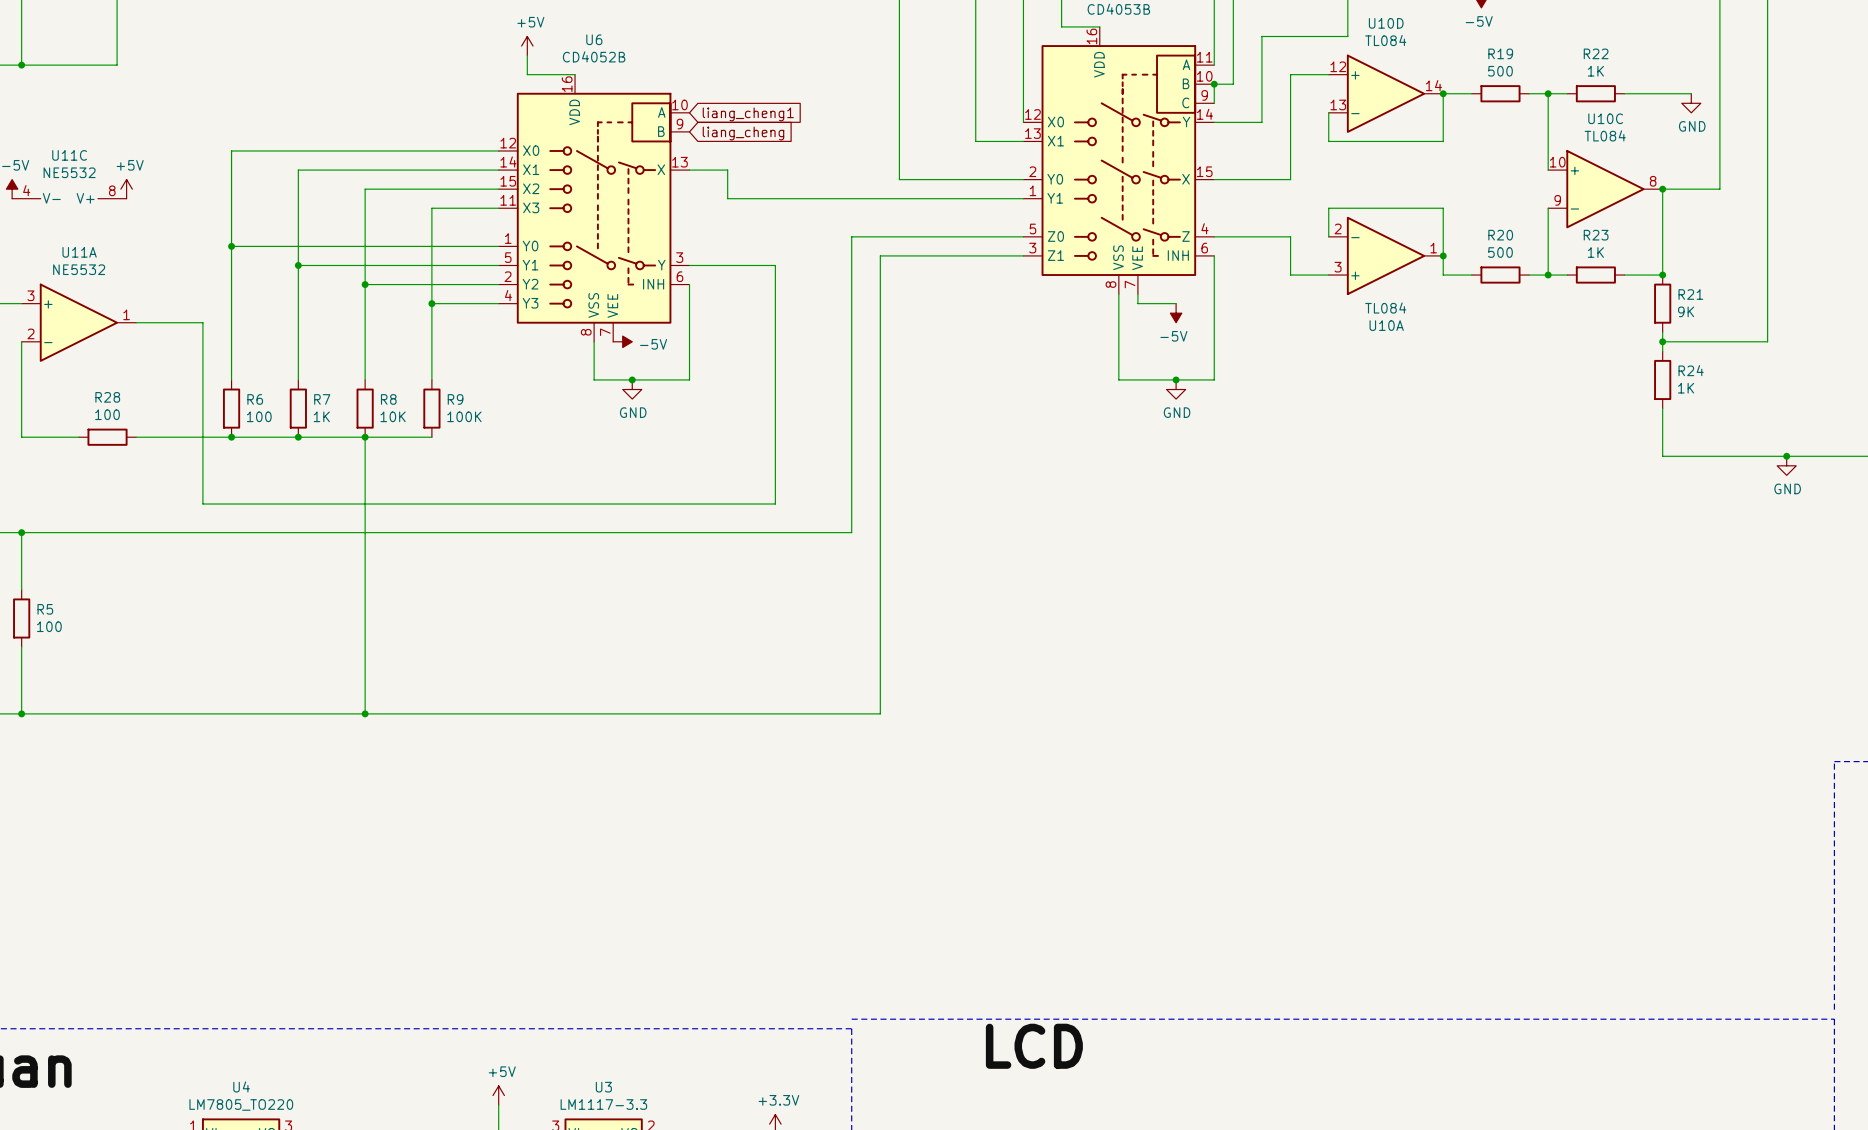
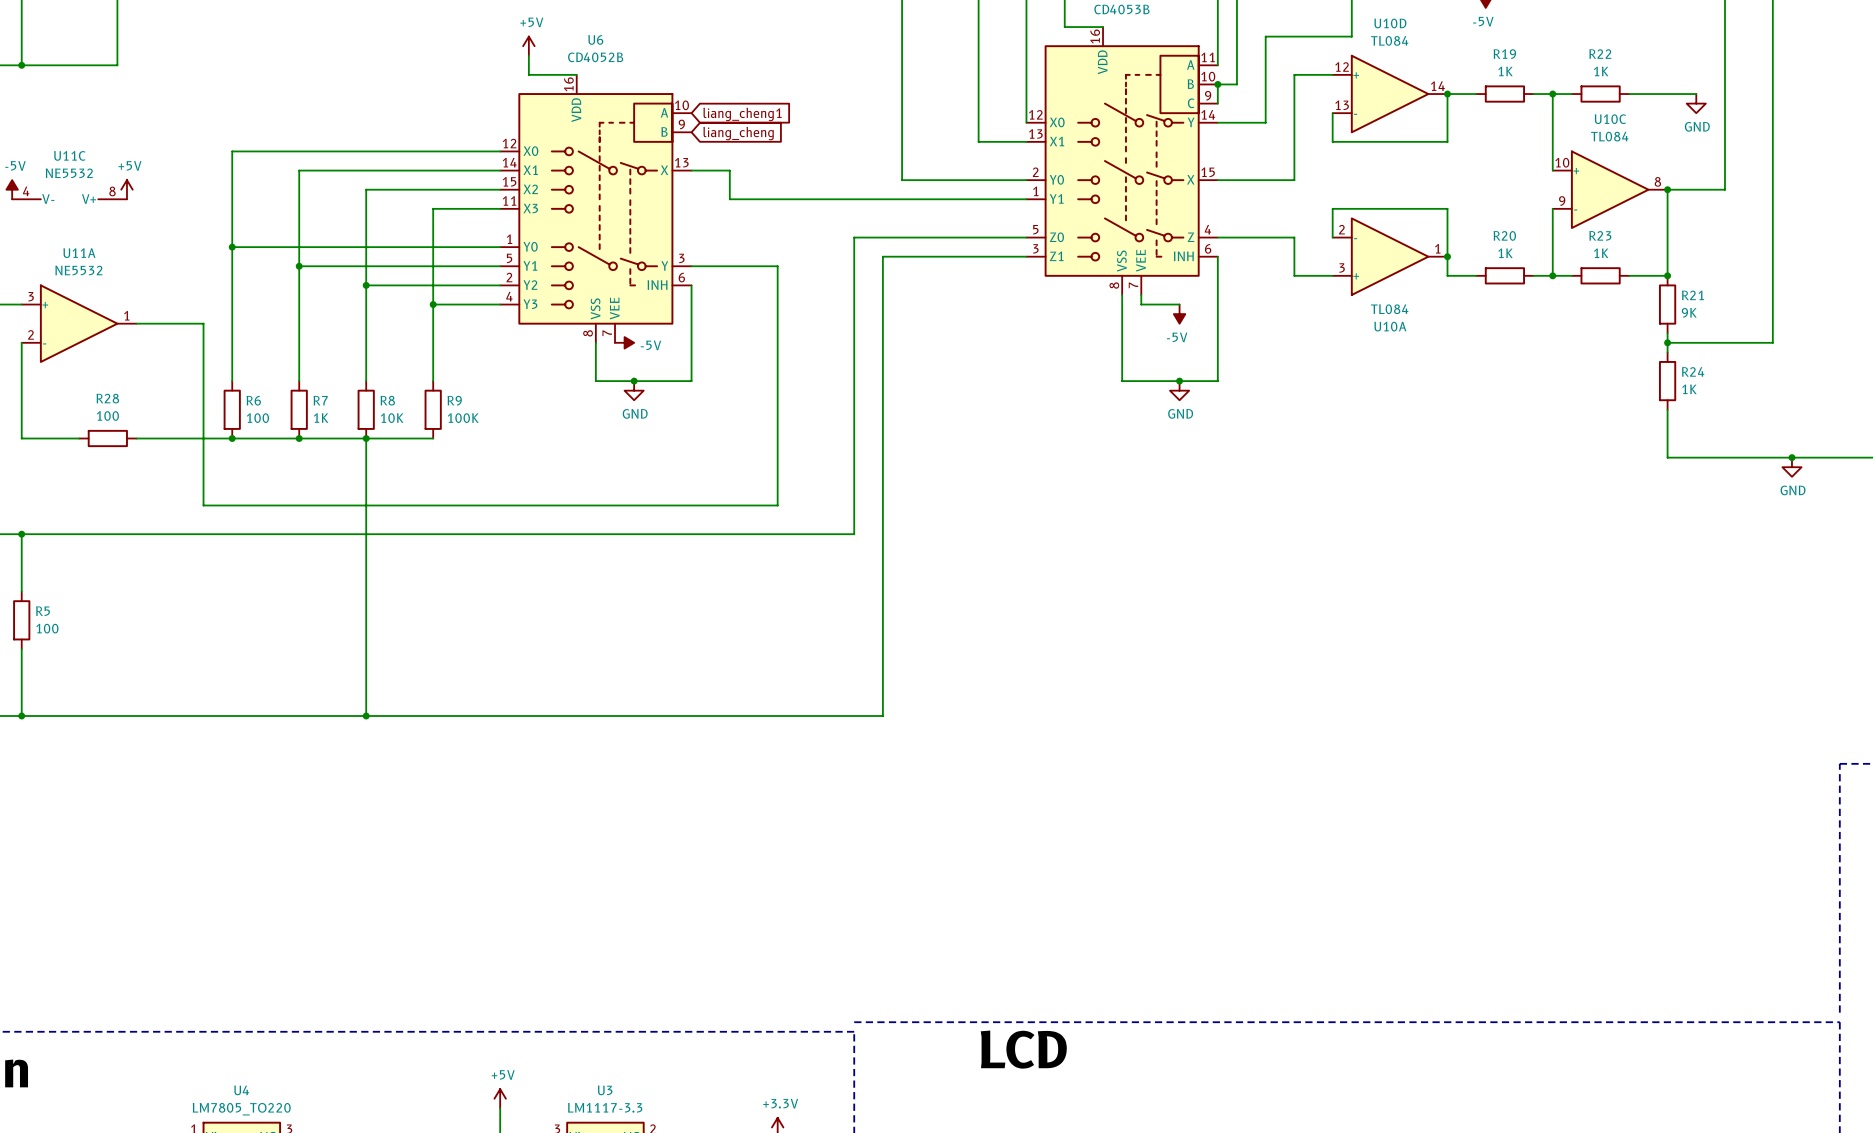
R19 value: 500 (1500, 71) -> 1K (1505, 71)
R20 value: 500 (1500, 252) -> 1K (1505, 253)

